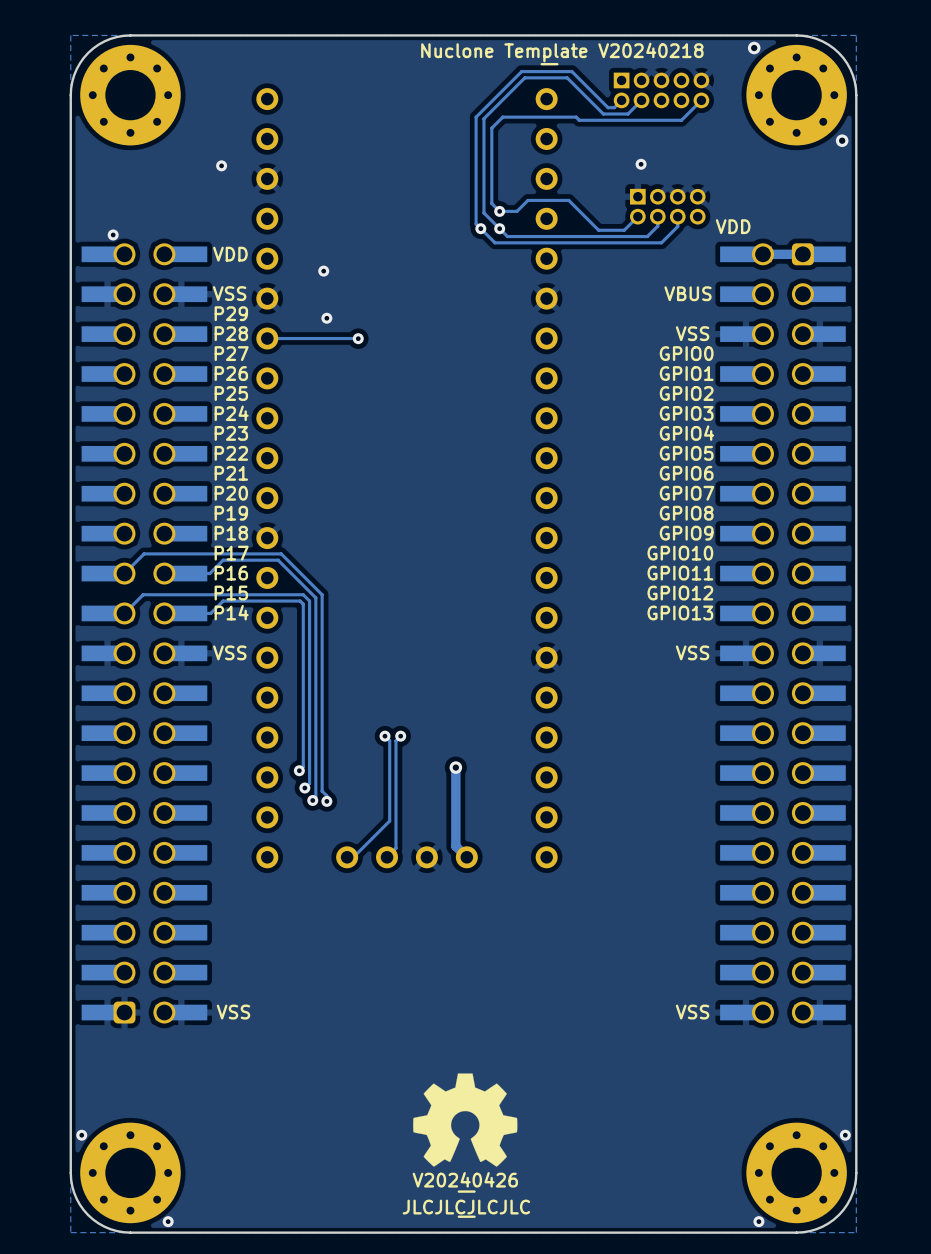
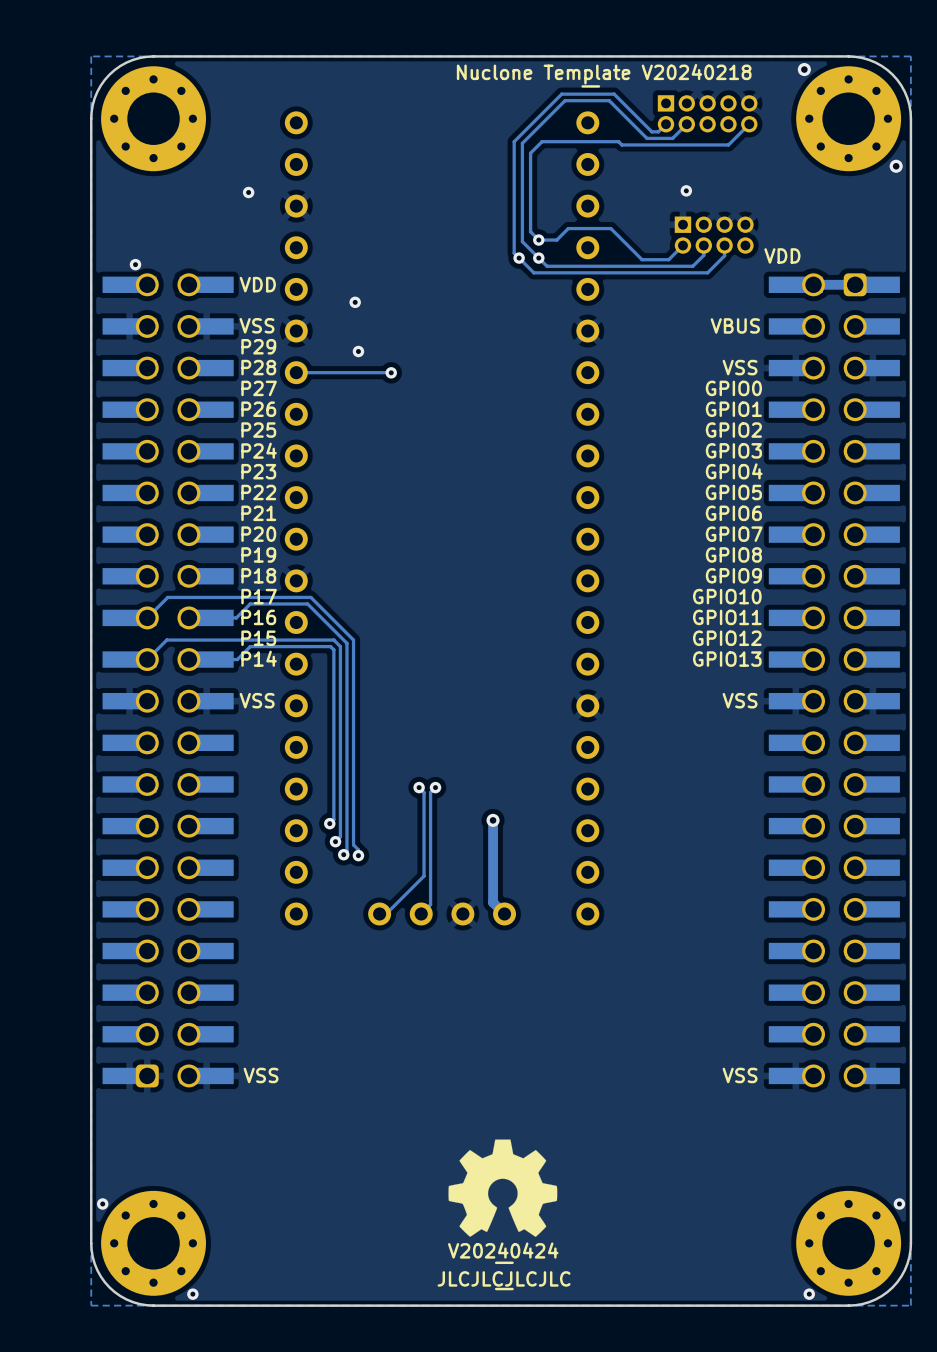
drawing shape: [412, 1172, 518, 1193] -> [447, 1242, 559, 1265]

